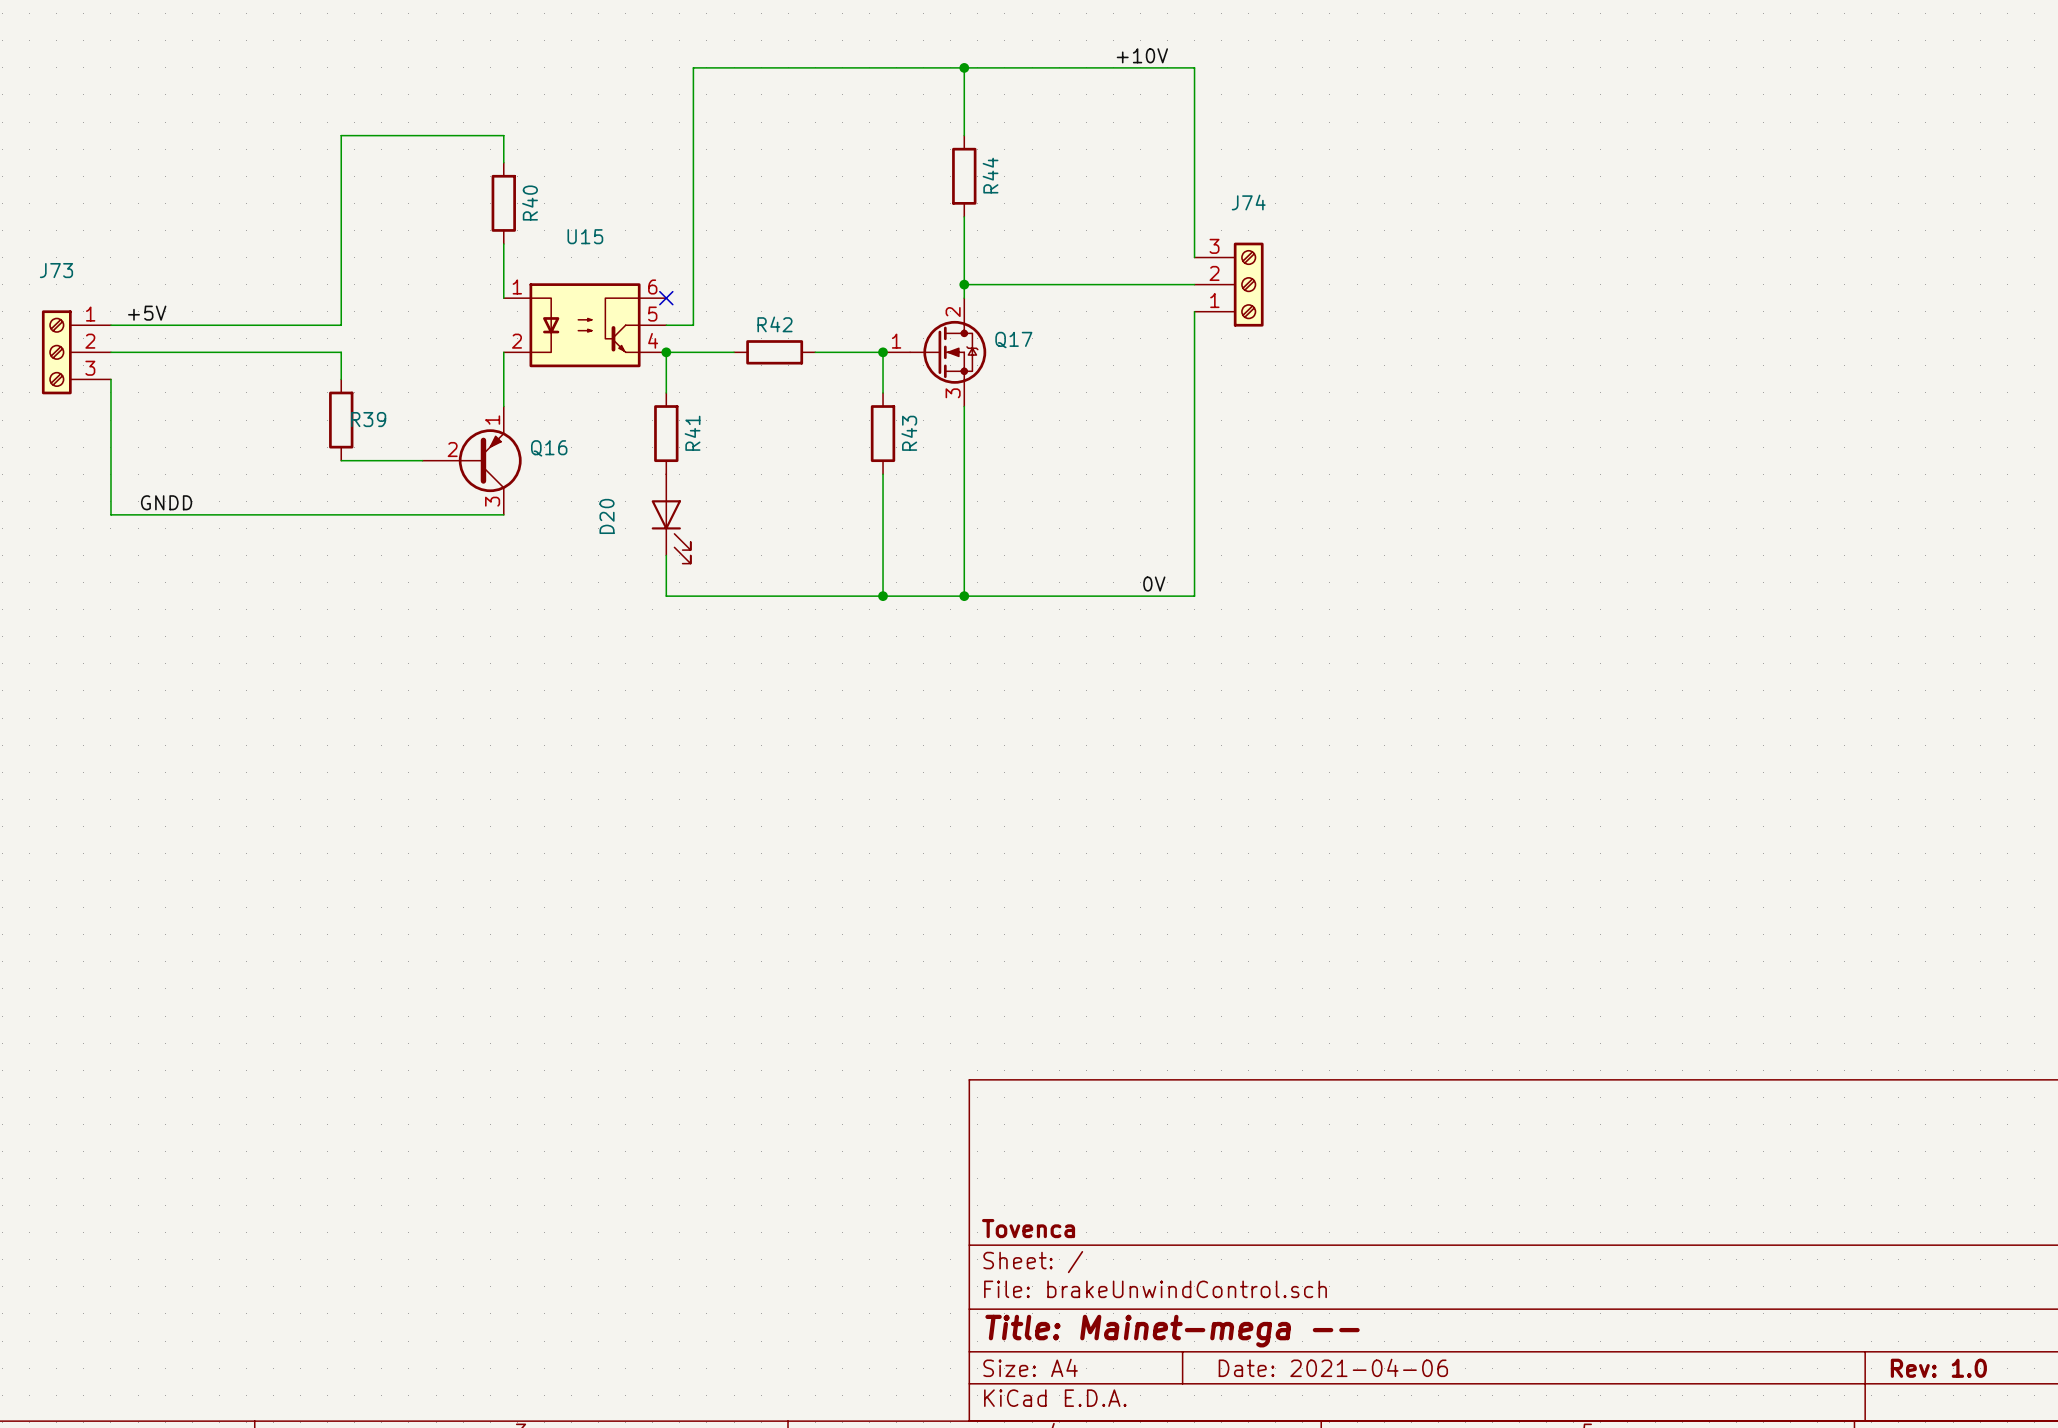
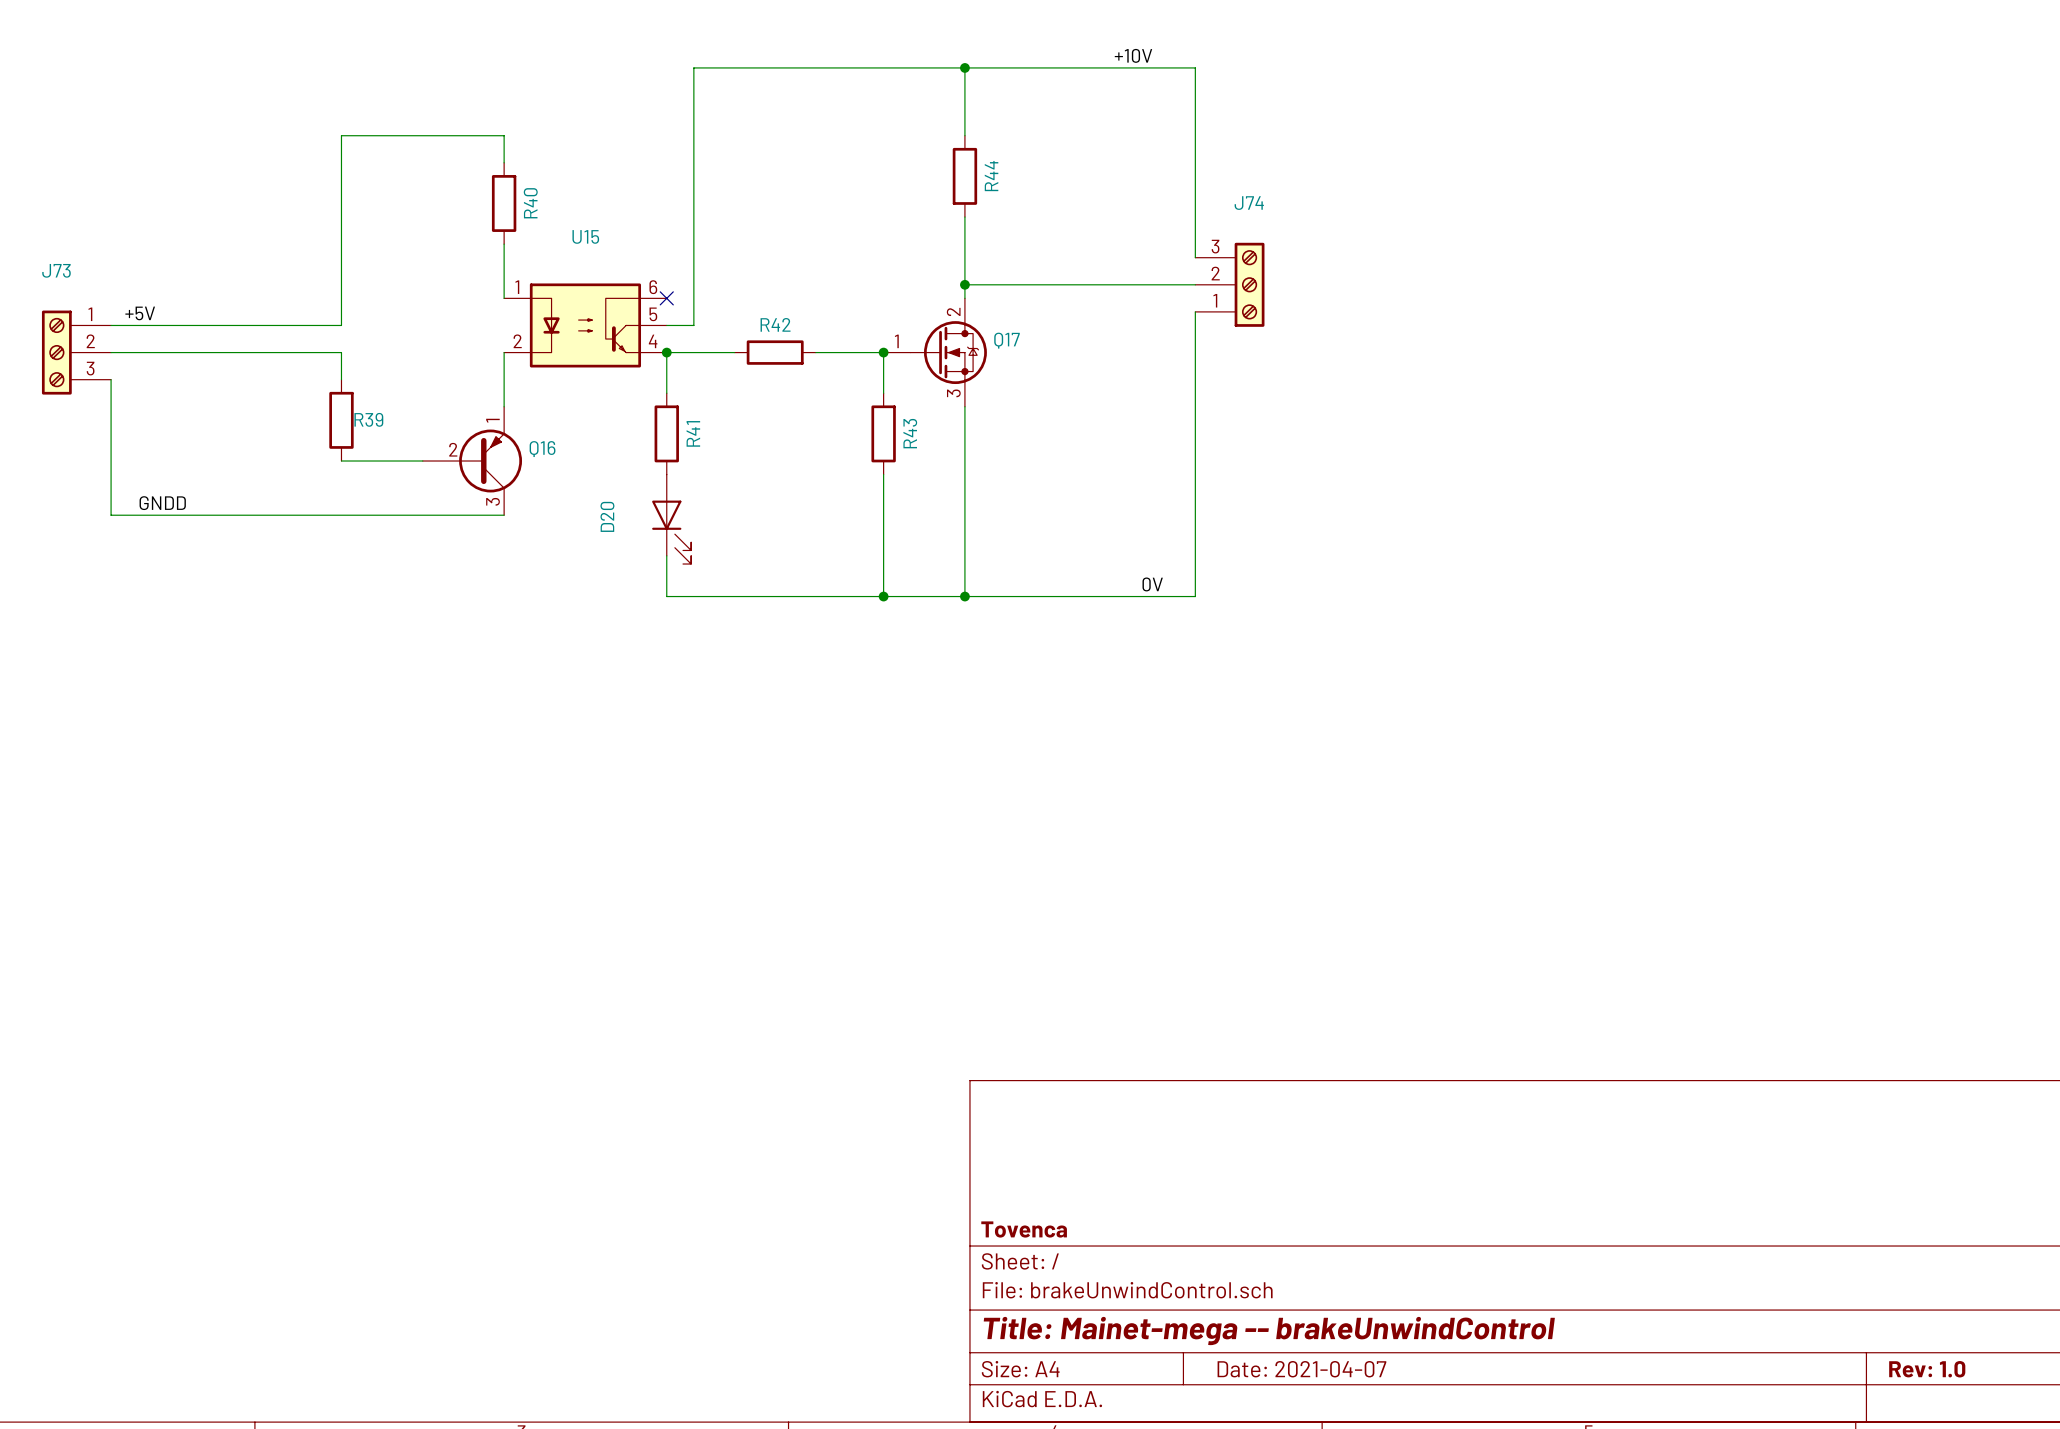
title block: Title: Mainet-mega -- (1172, 1331) -> Title: Mainet-mega -- brakeUnwindControl (1269, 1331)
title block: Date: 2021-04-06 (1333, 1367) -> Date: 2021-04-07 (1301, 1369)

